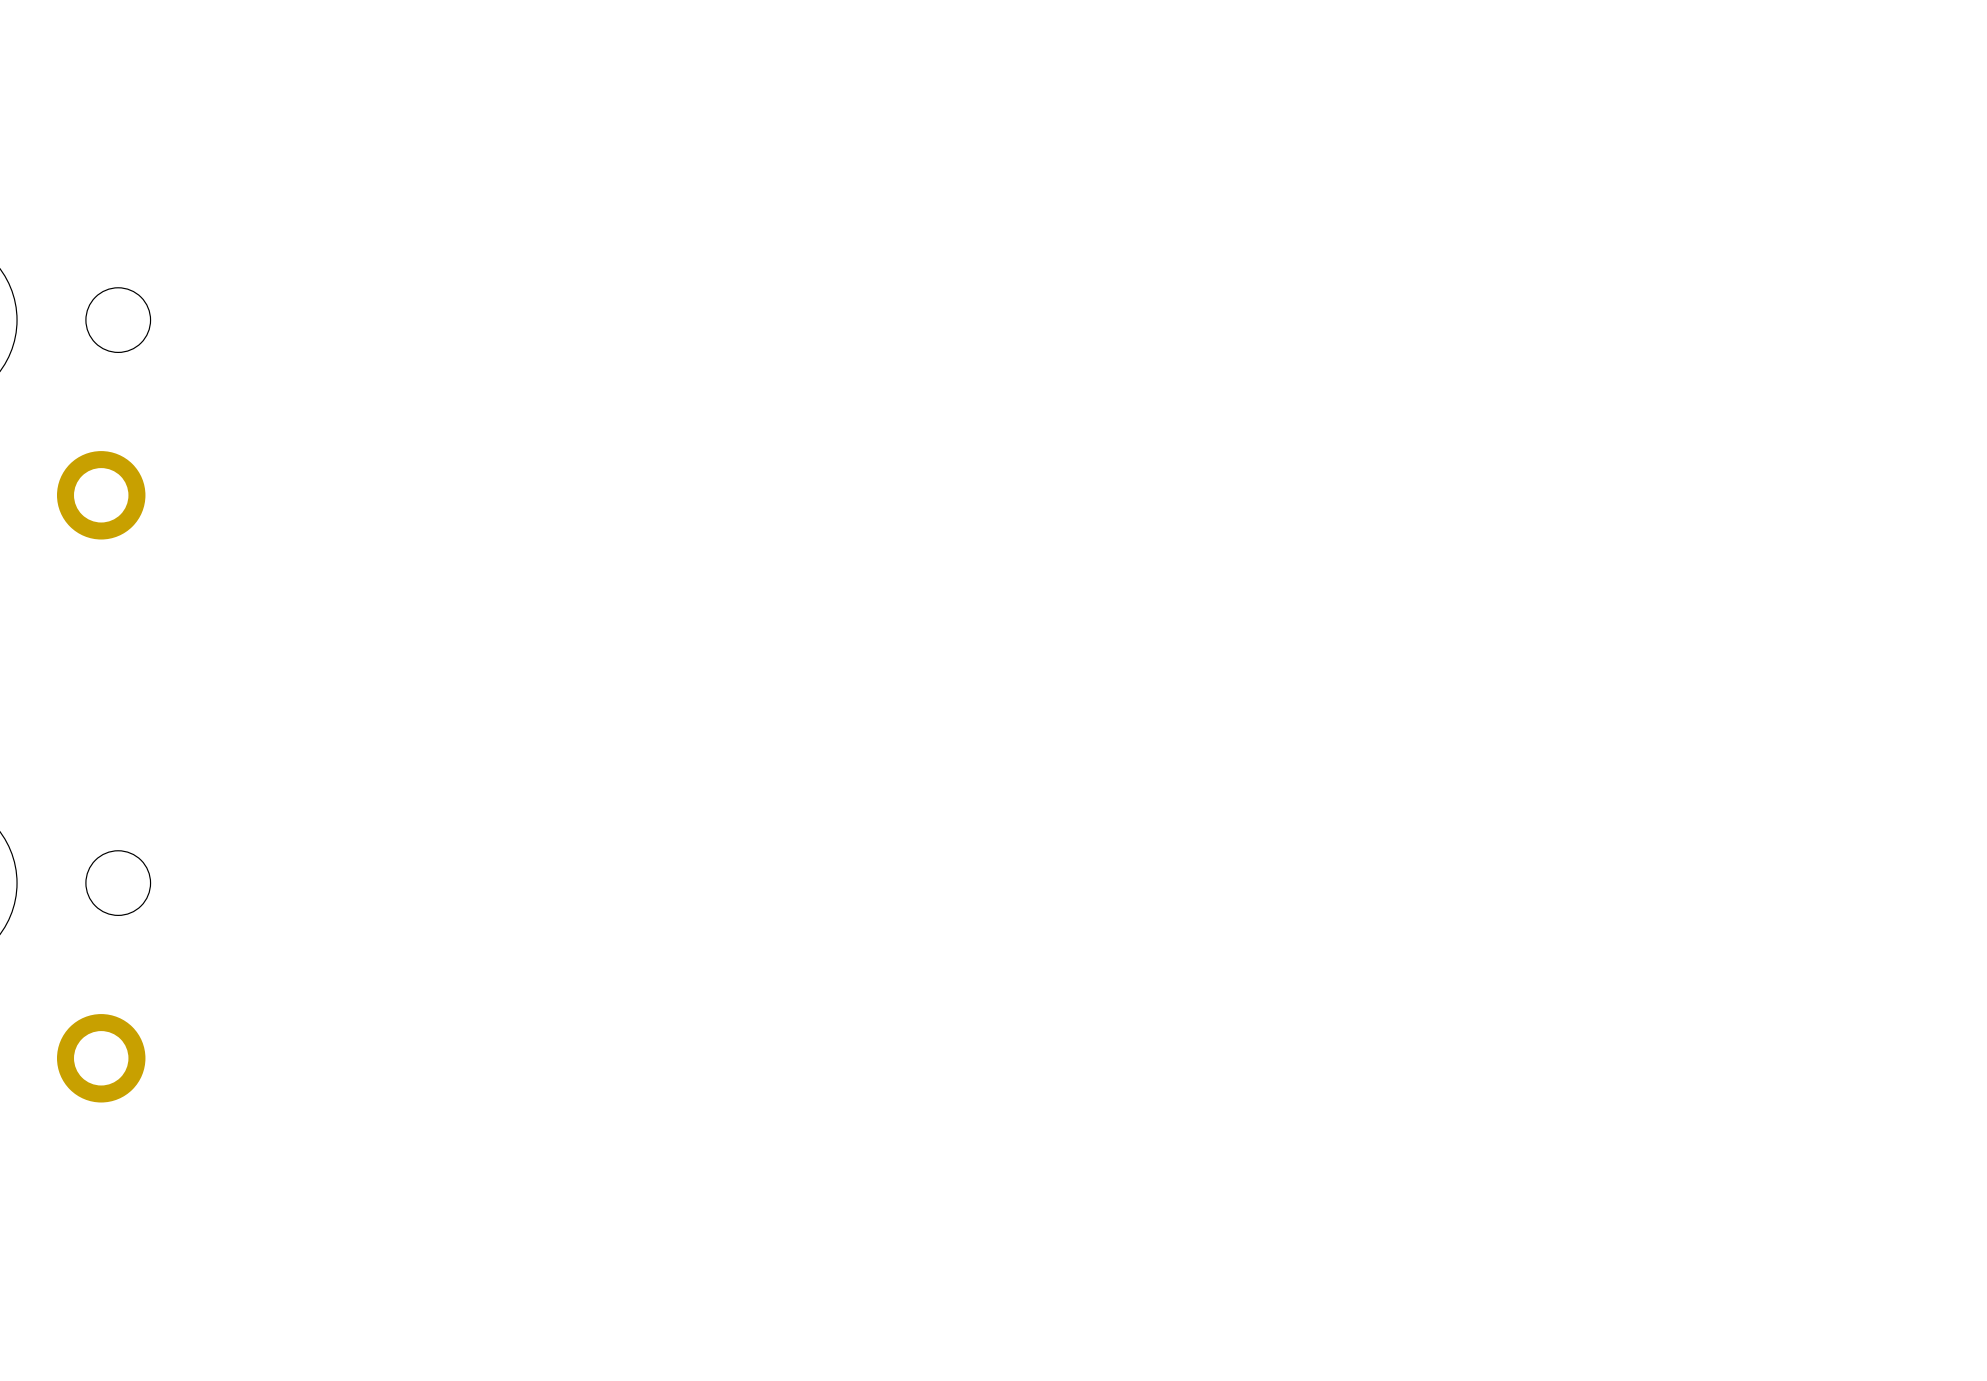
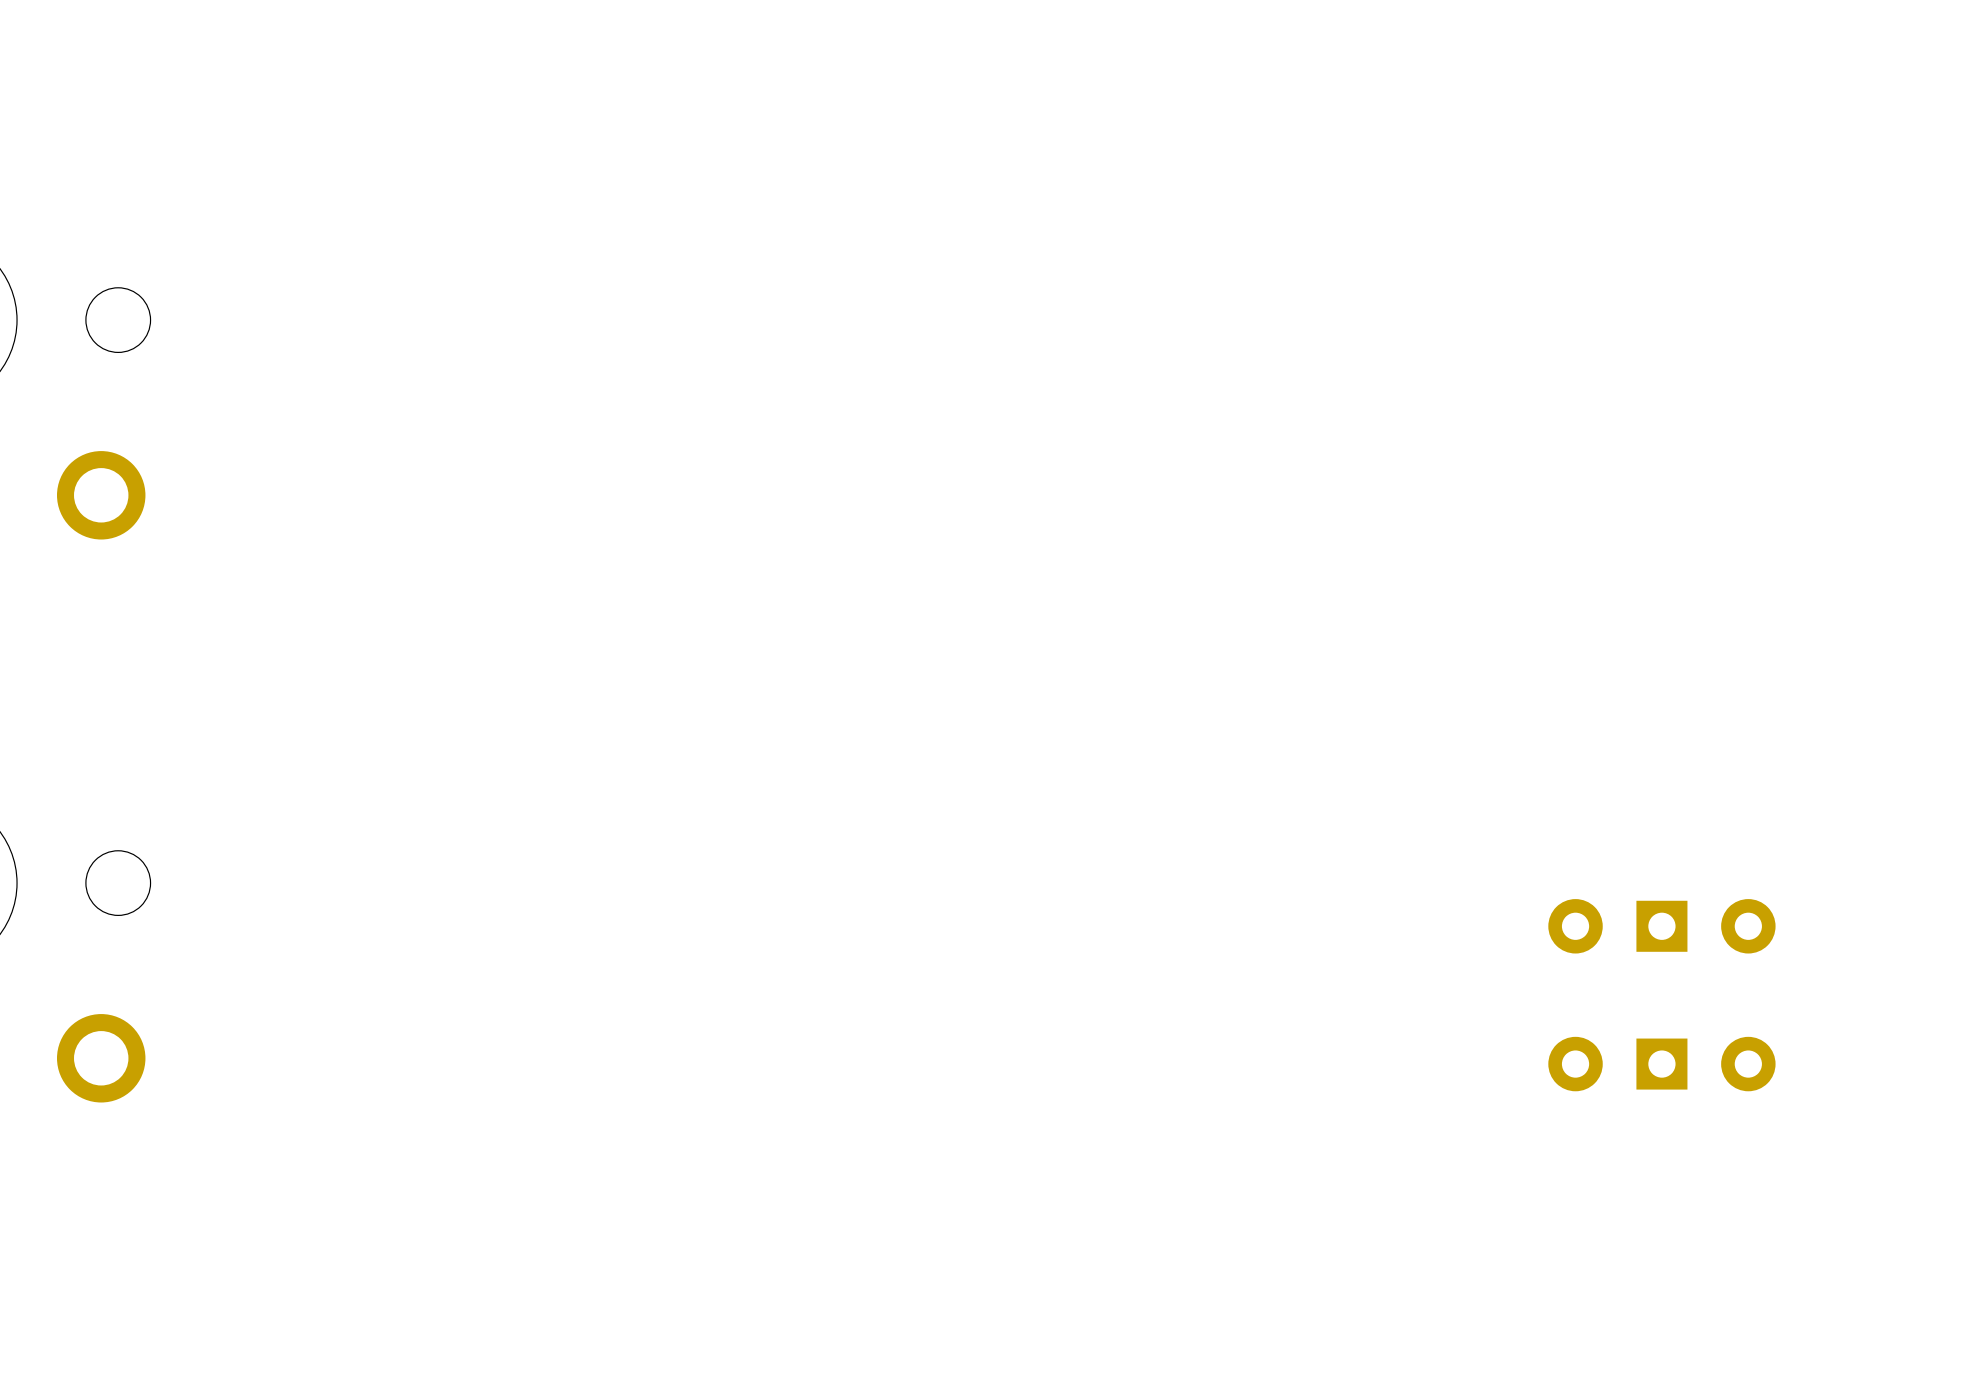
part: none -> (1661, 926)
part: none -> (1661, 1064)

